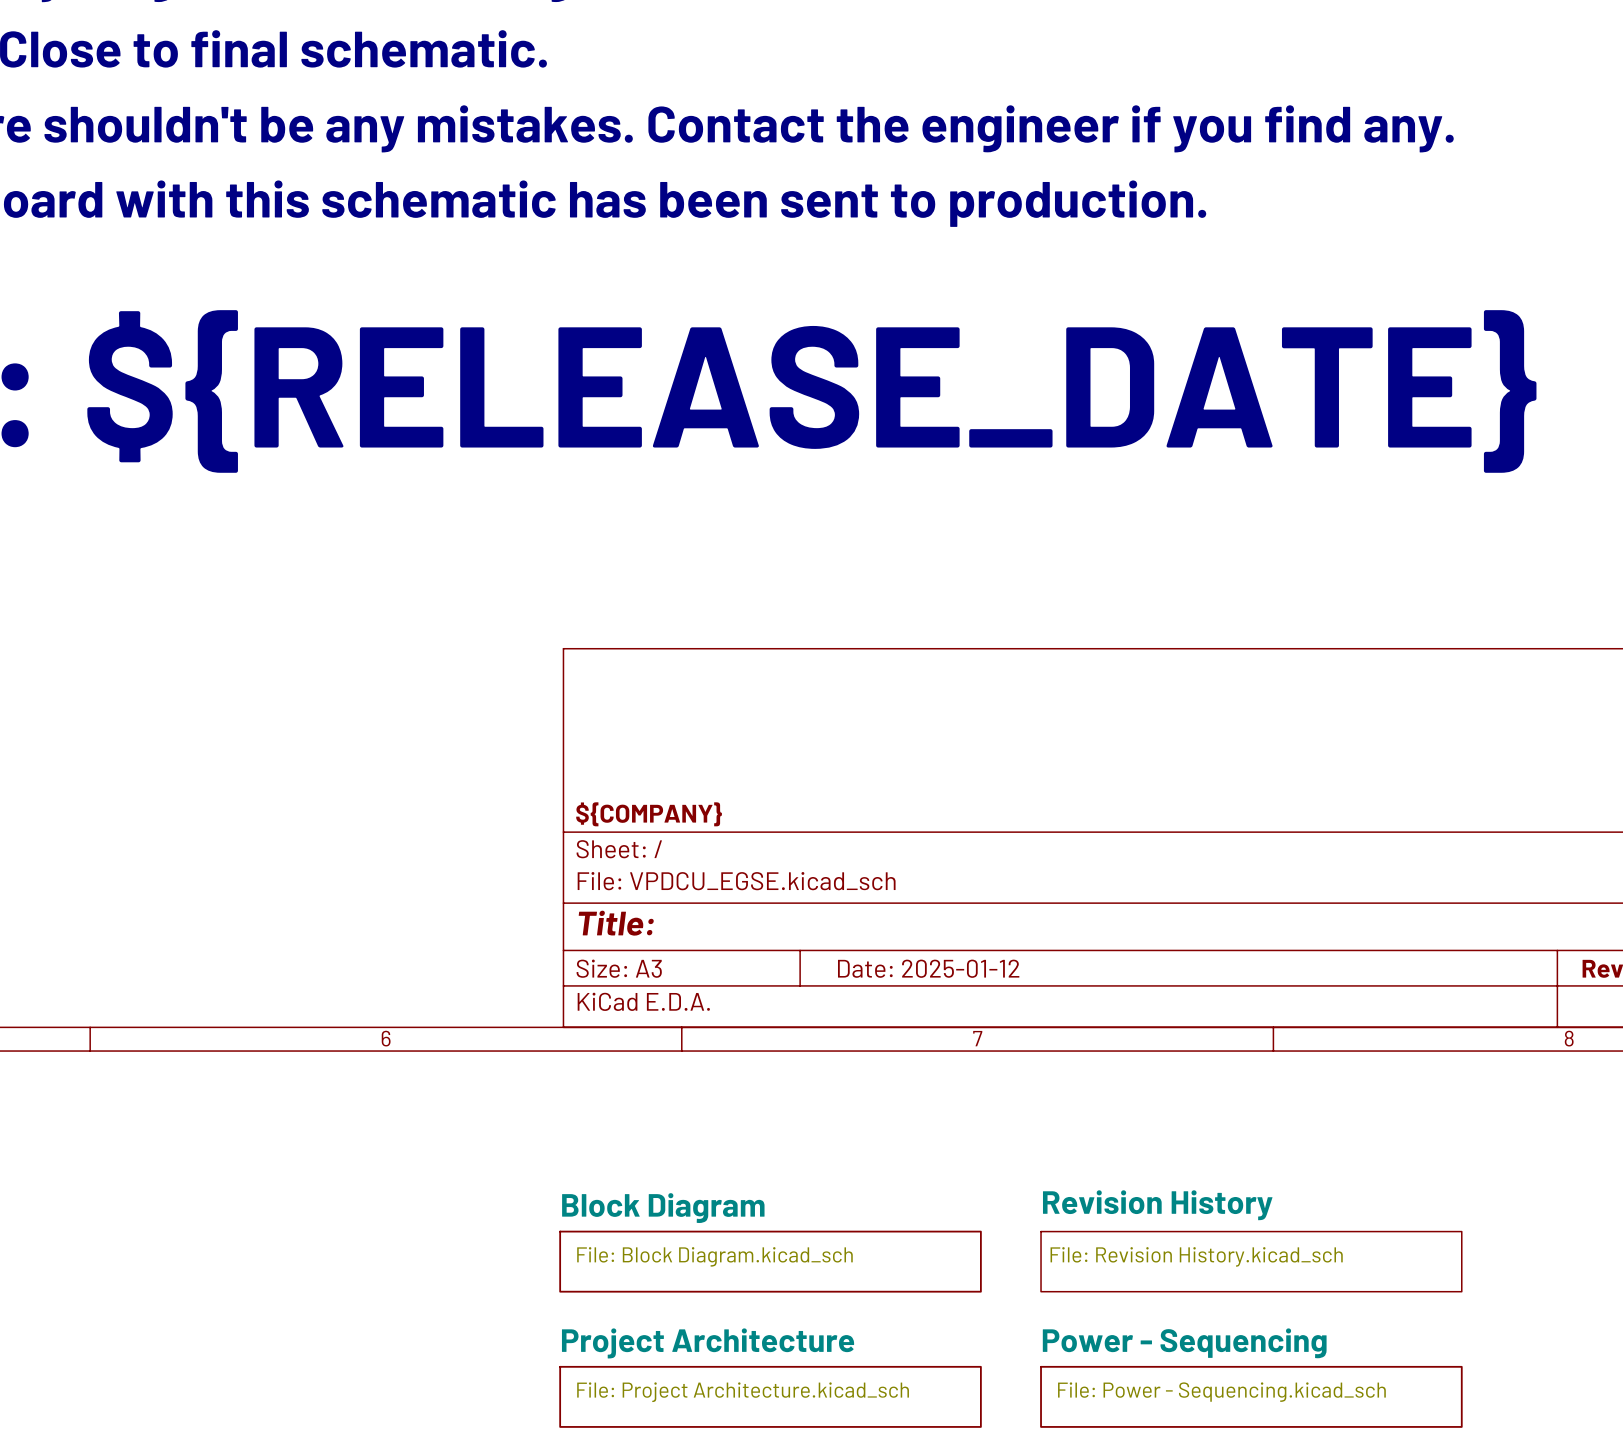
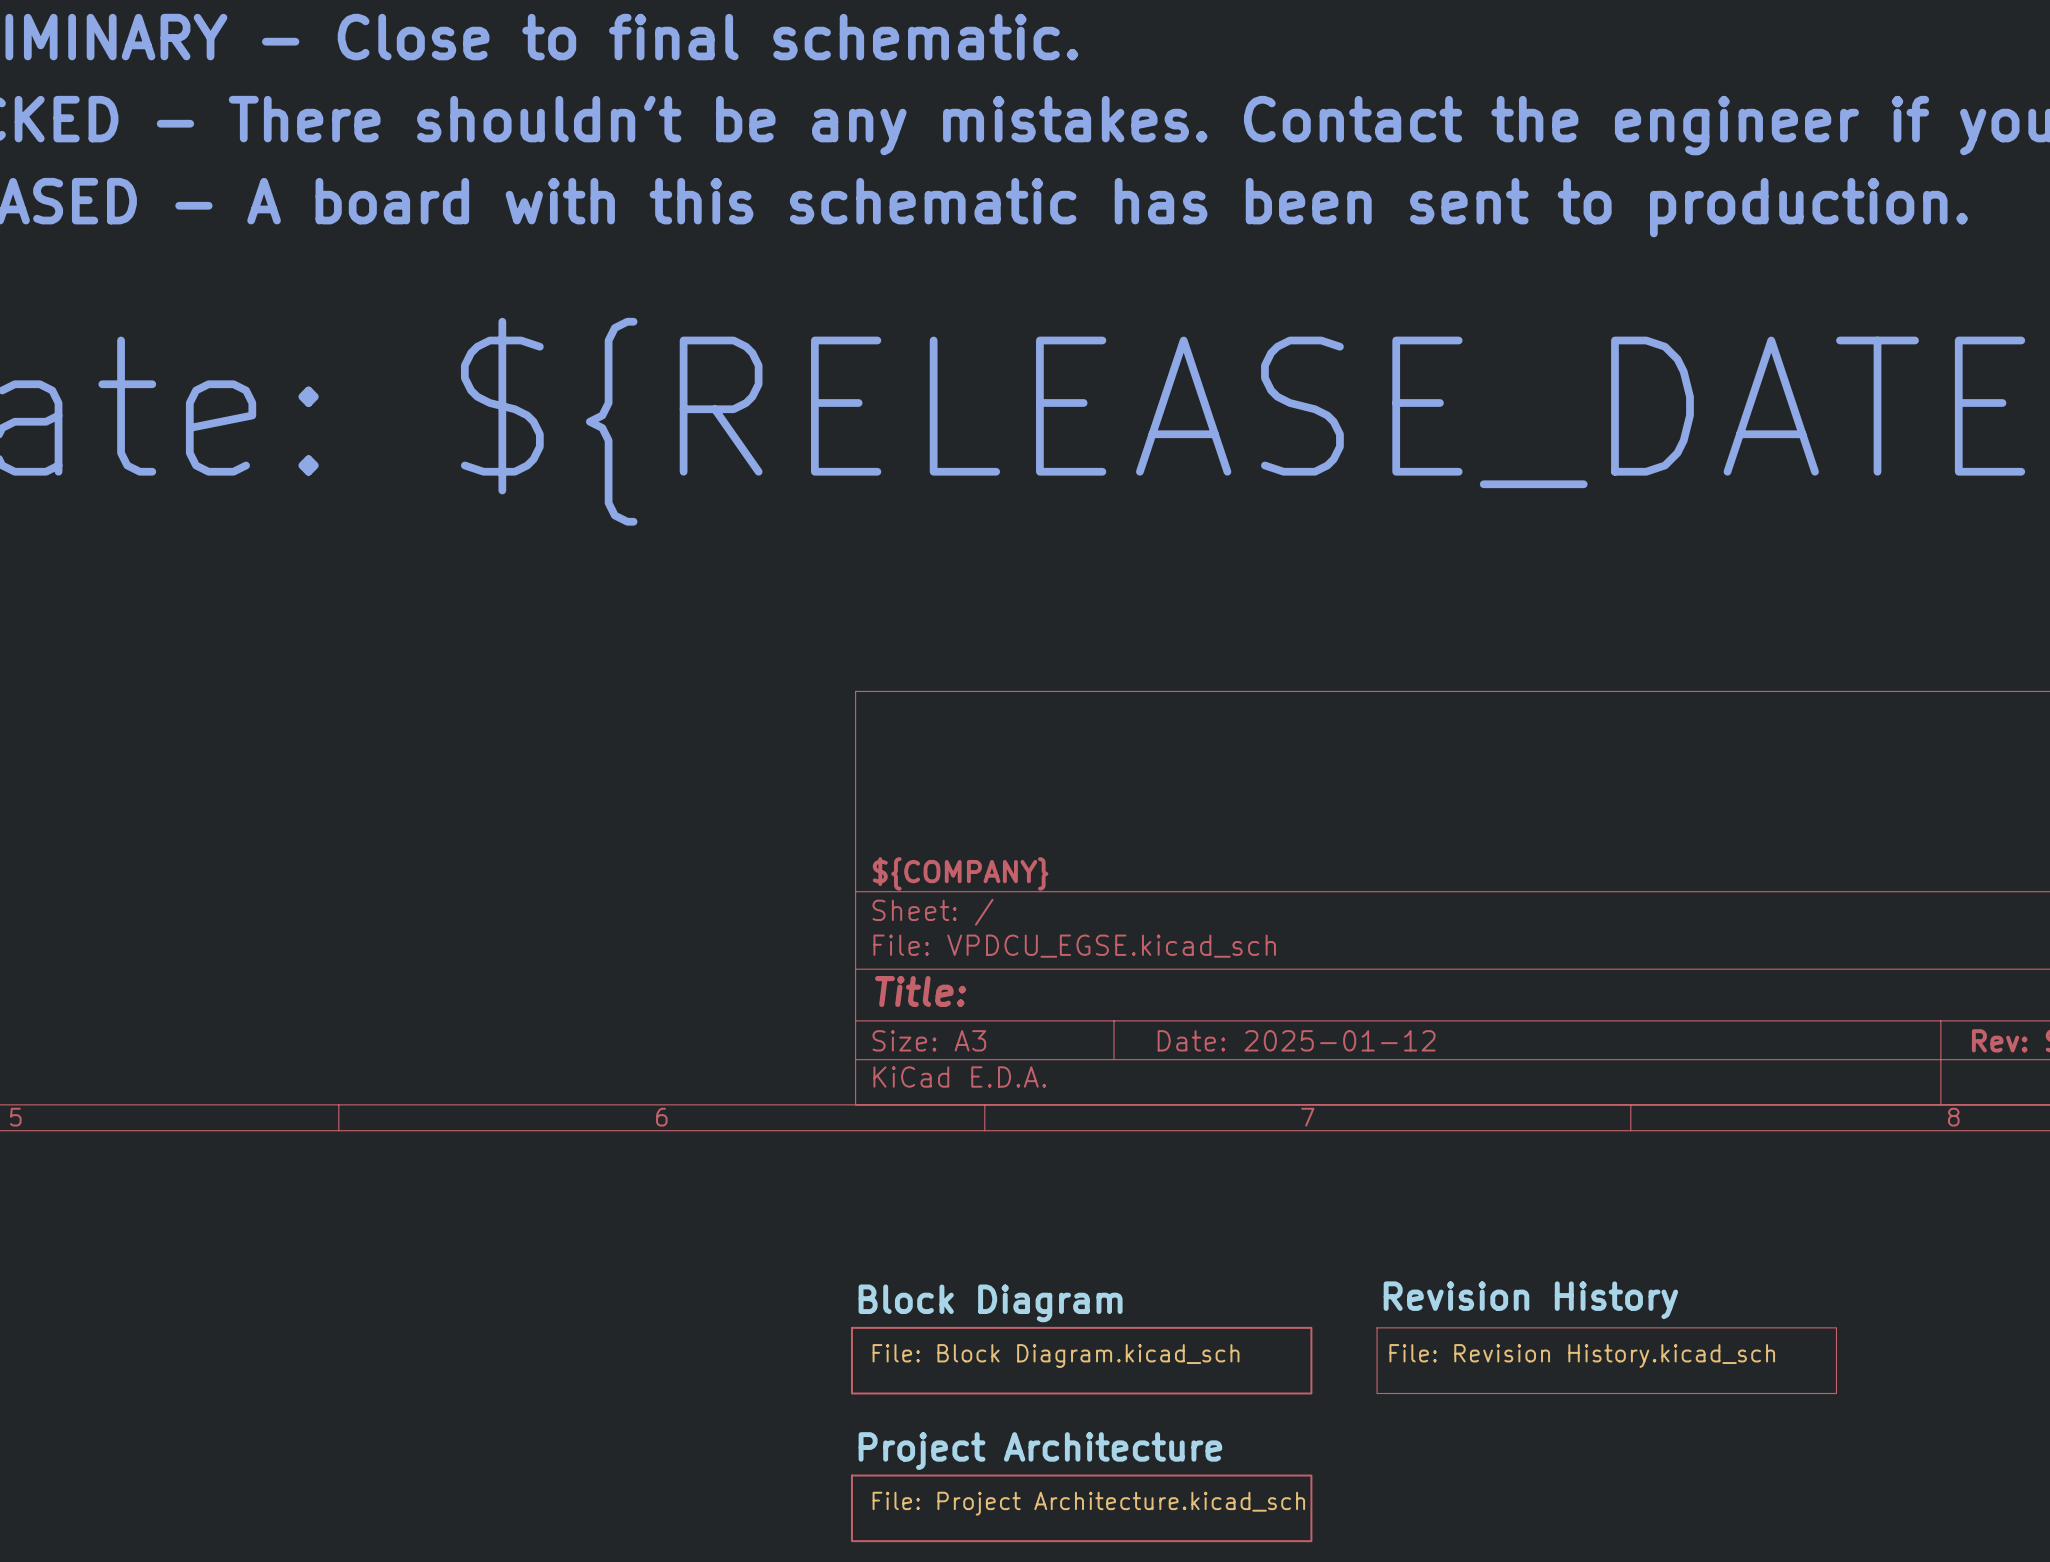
sheet Power - Sequencing: File: Power - Sequencing.kicad_sch (1251, 1396) -> none

